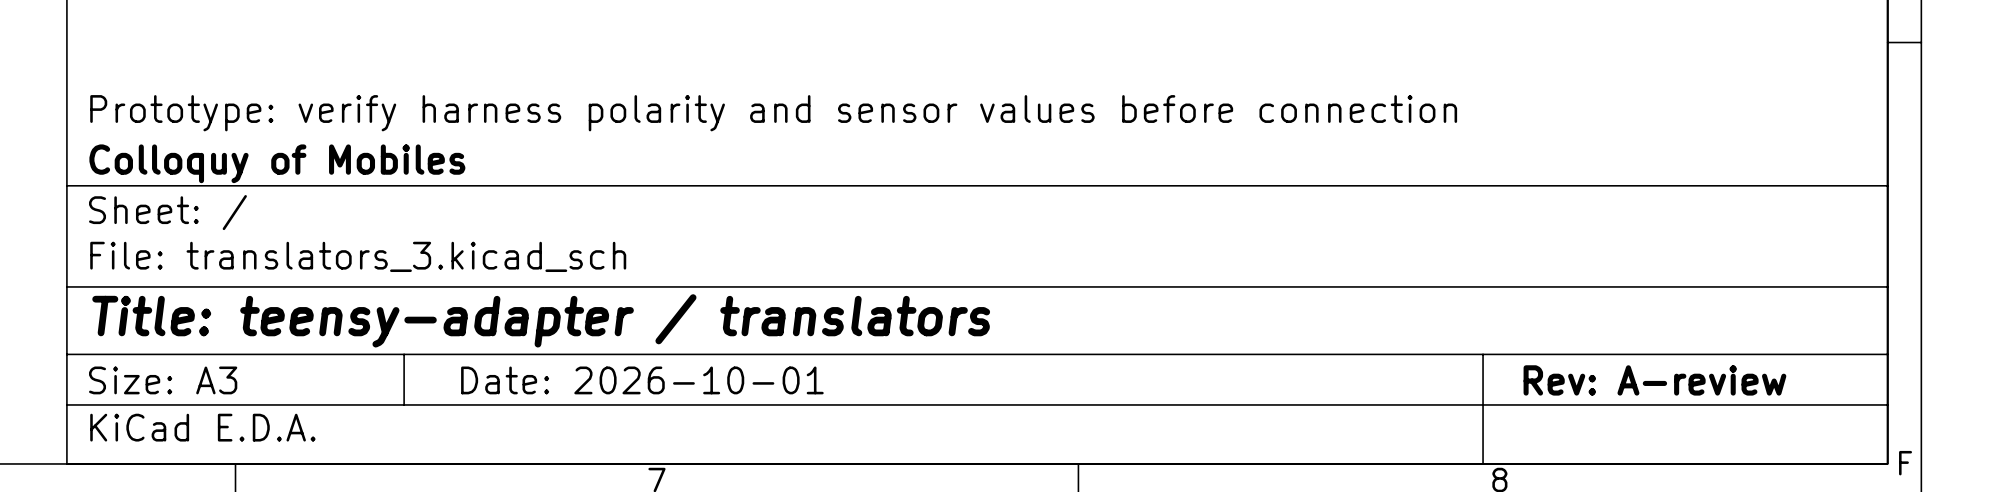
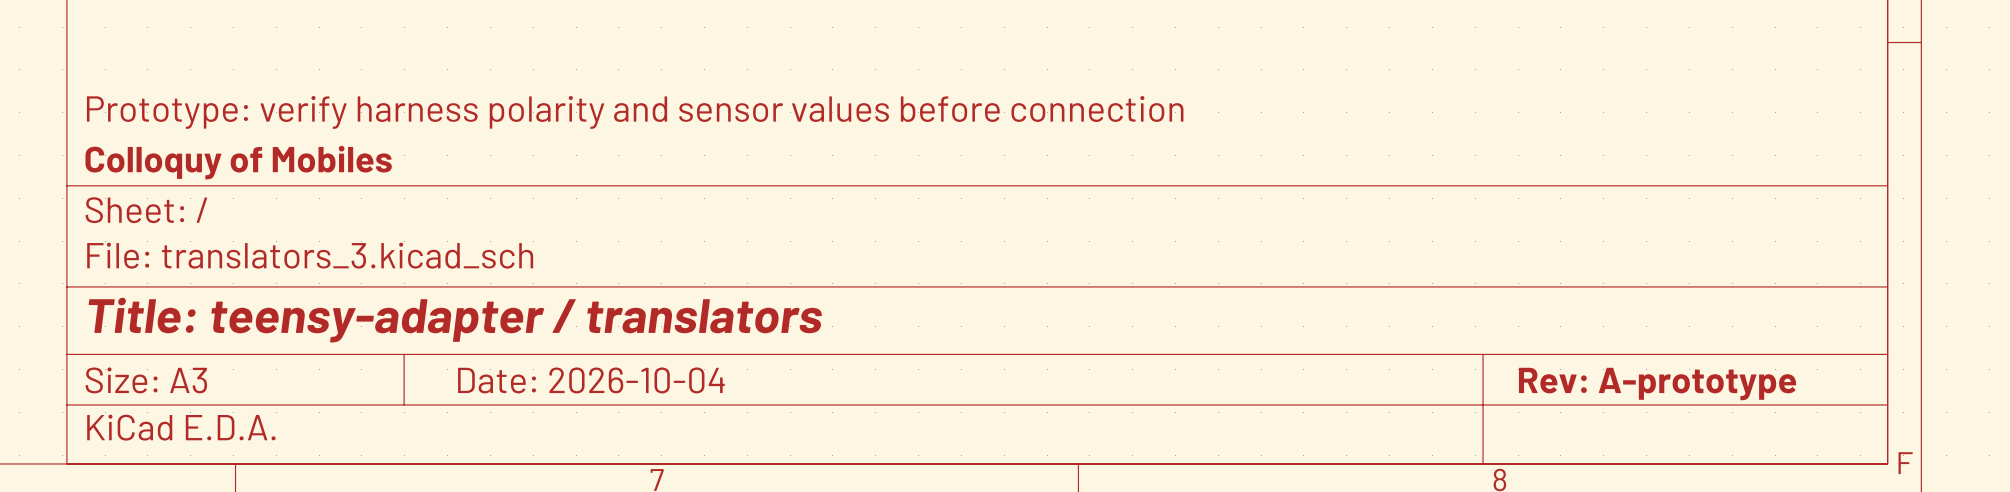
title block: Date: 2026-10-01 (642, 380) -> Date: 2026-10-04 (591, 380)
title block: Rev: A-review (1654, 380) -> Rev: A-prototype (1657, 384)

